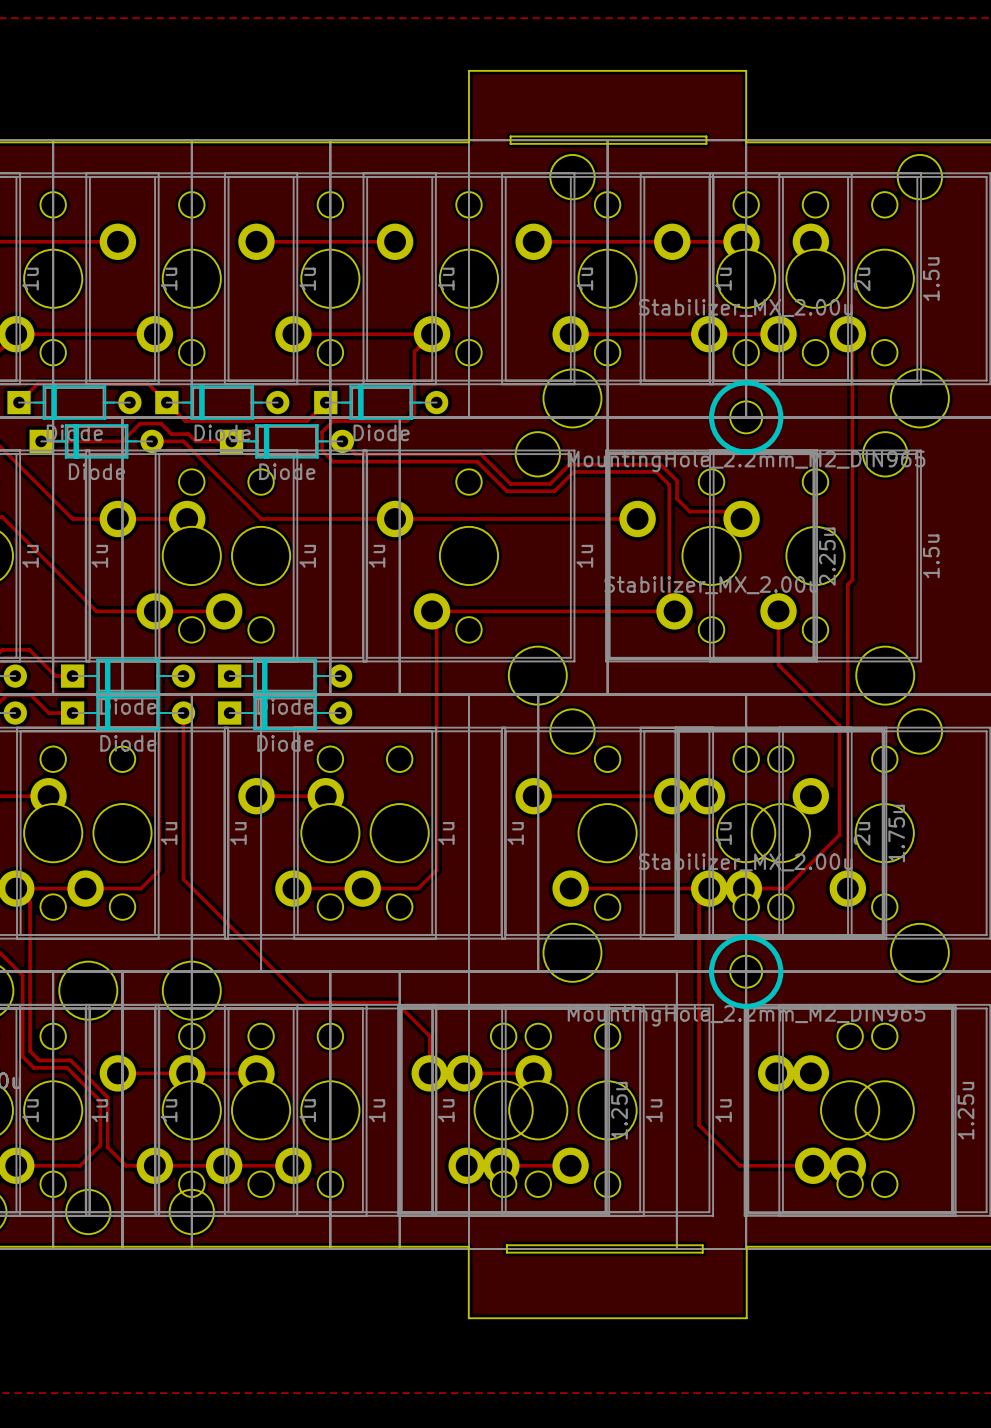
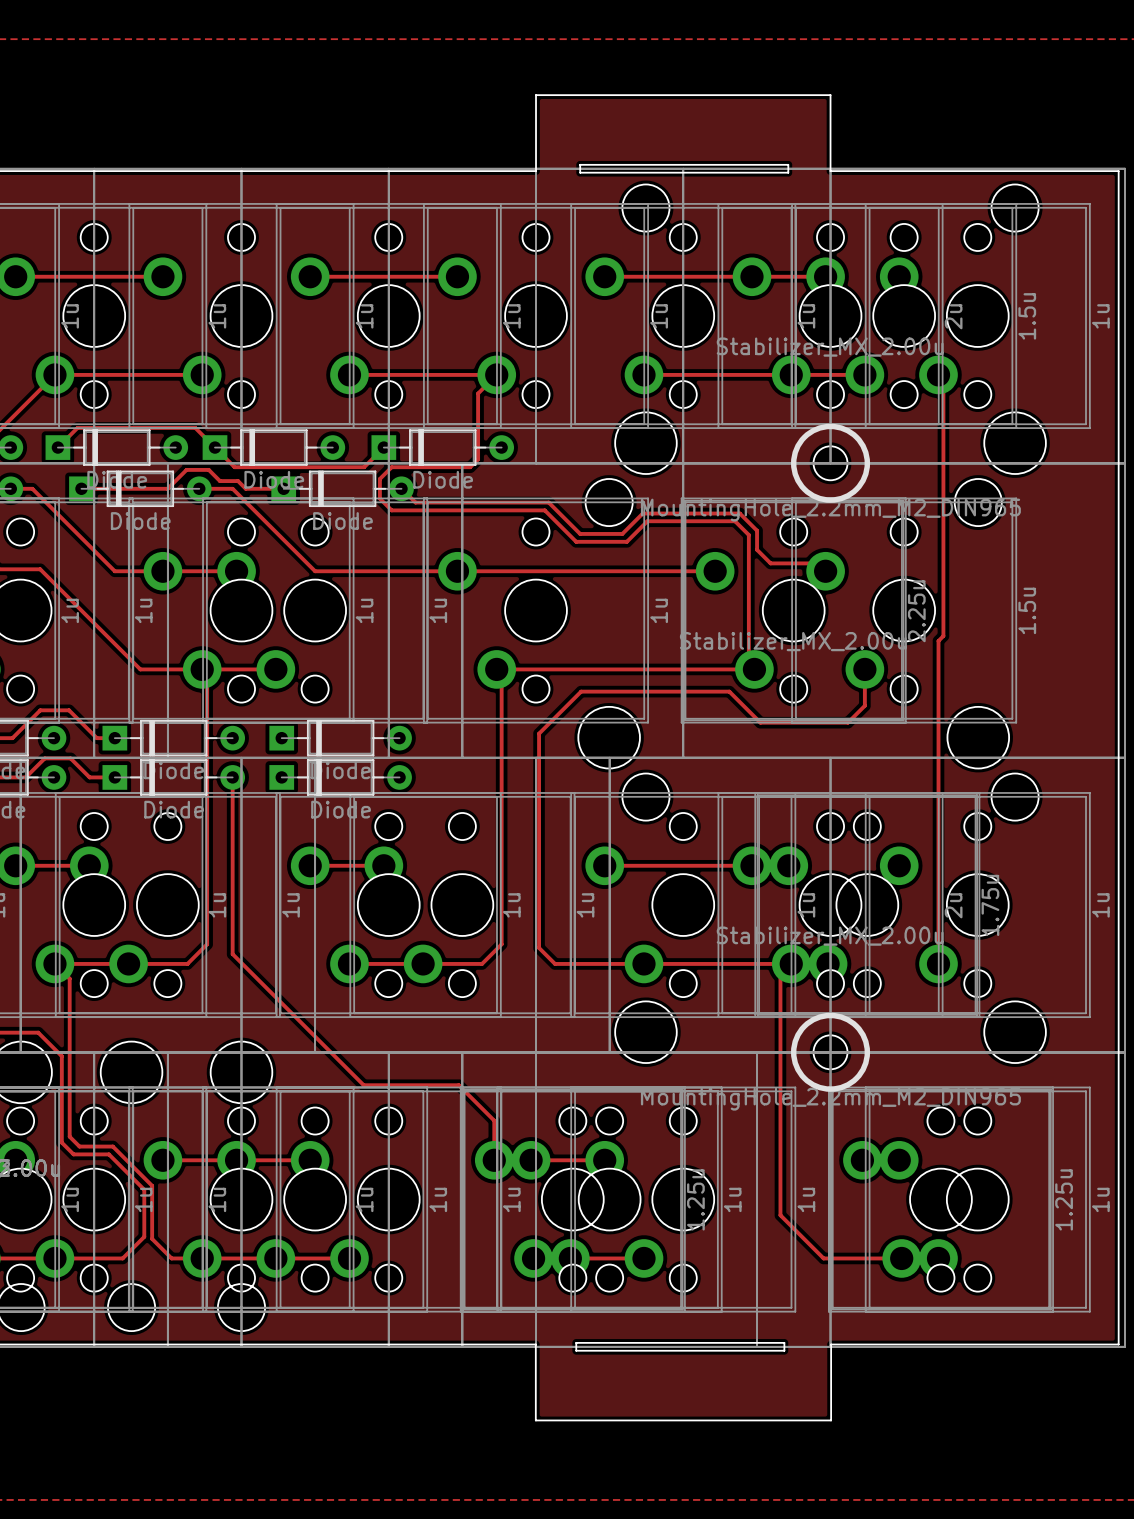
track: (778, 645) (778, 664) (839, 725) (839, 835) (785, 888) (743, 888) -> (864, 705) (847, 722) (760, 722) (729, 691) (581, 691) (539, 733) (539, 947) (555, 963) (643, 963)

